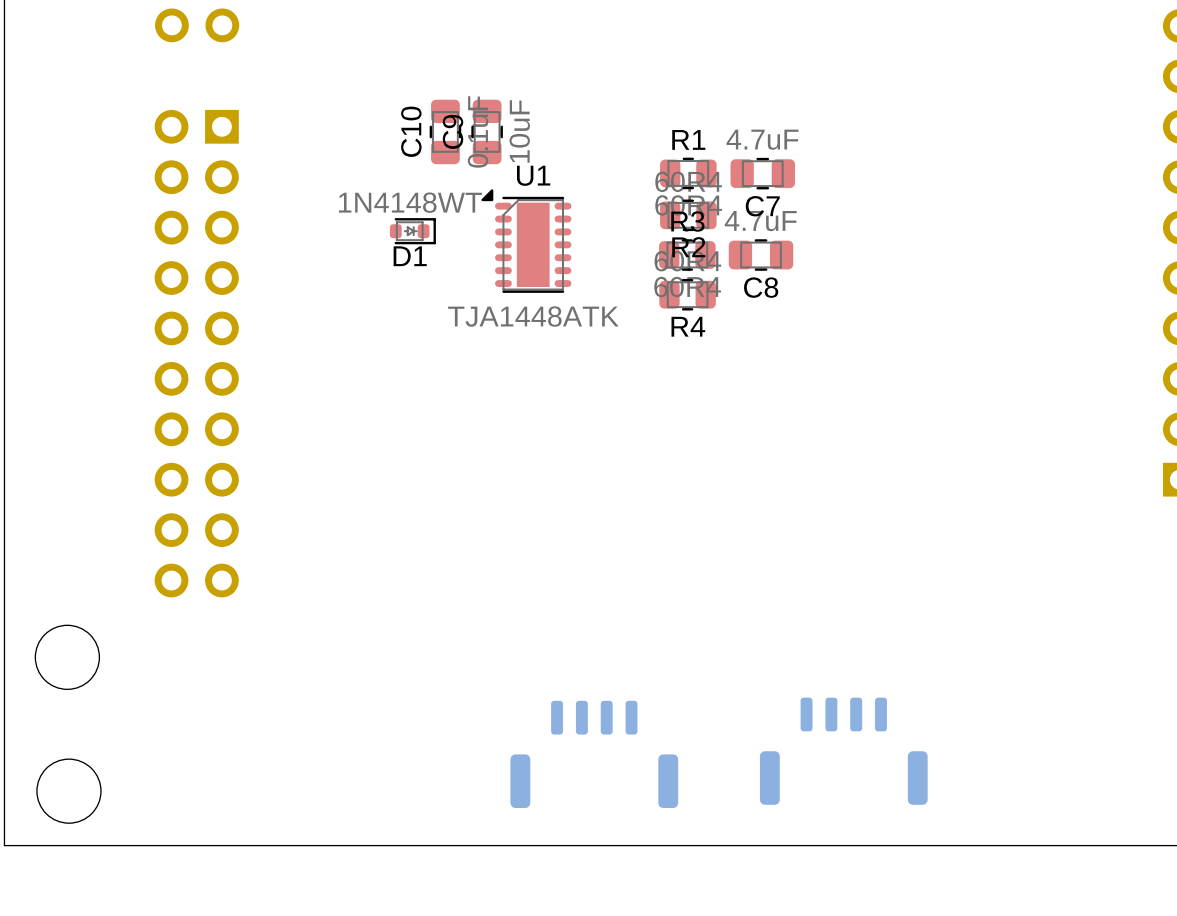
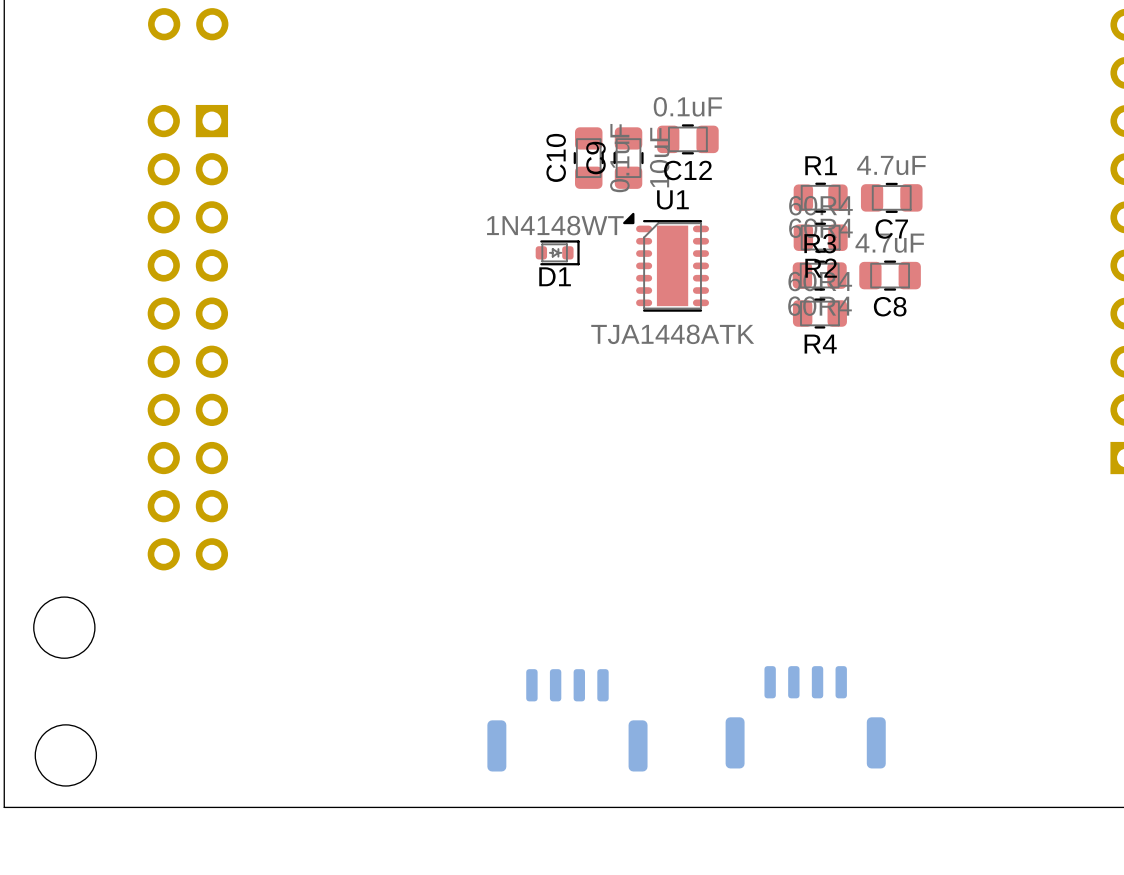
C10 position: (445, 131) -> (588, 158)
C9 position: (487, 131) -> (628, 158)
C12: none -> 0.1uF (687, 139)
R1 position: (688, 173) -> (820, 197)
C7 position: (762, 173) -> (891, 197)
R2 position: (688, 215) -> (820, 237)
D1 position: (412, 231) -> (557, 252)
U1 position: (526, 241) -> (666, 262)
R3 position: (687, 255) -> (819, 275)
C8 position: (761, 255) -> (890, 275)
R4 position: (687, 294) -> (819, 313)

